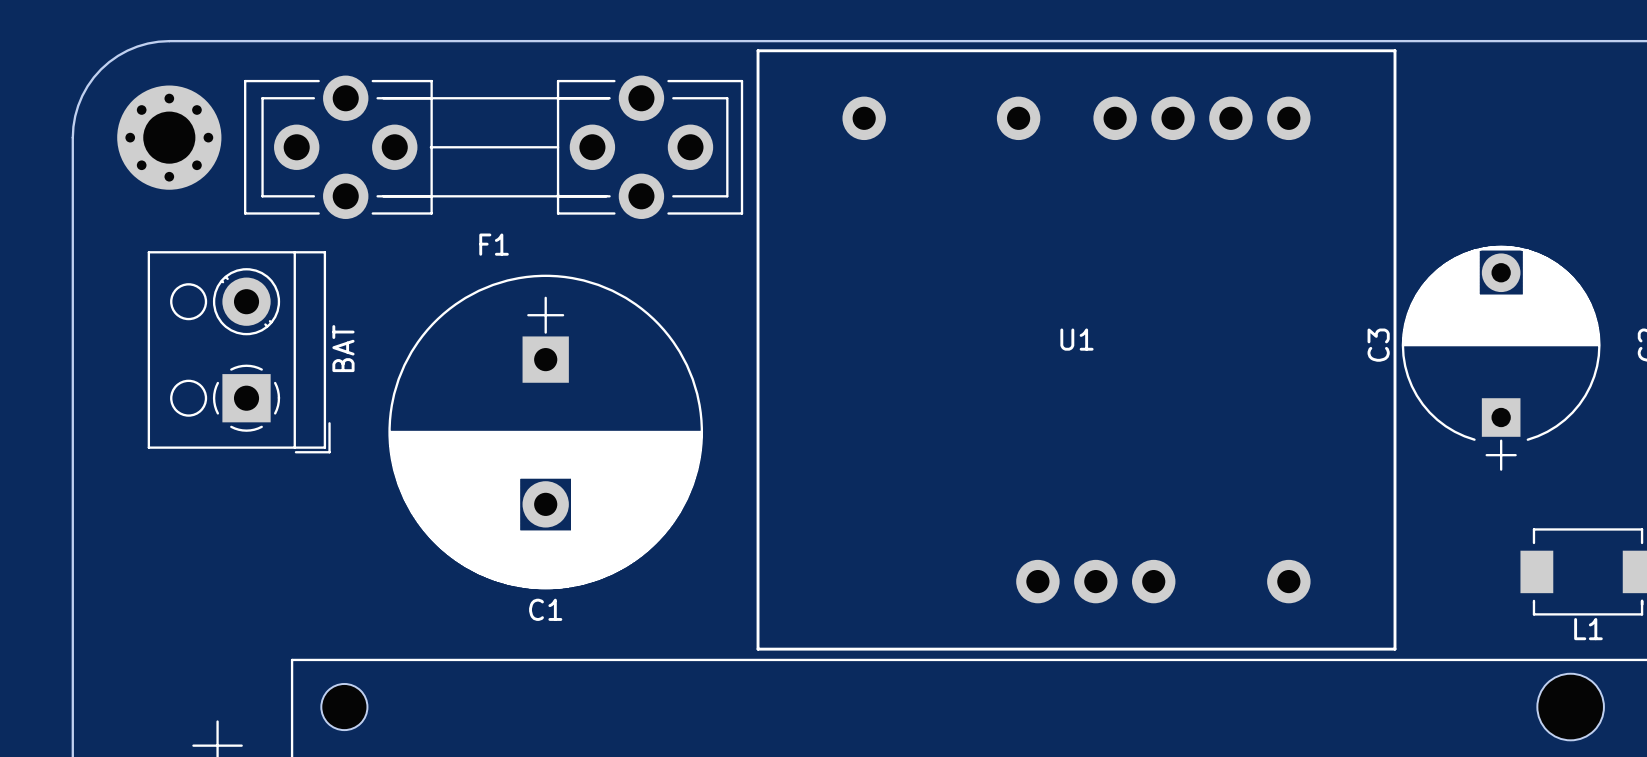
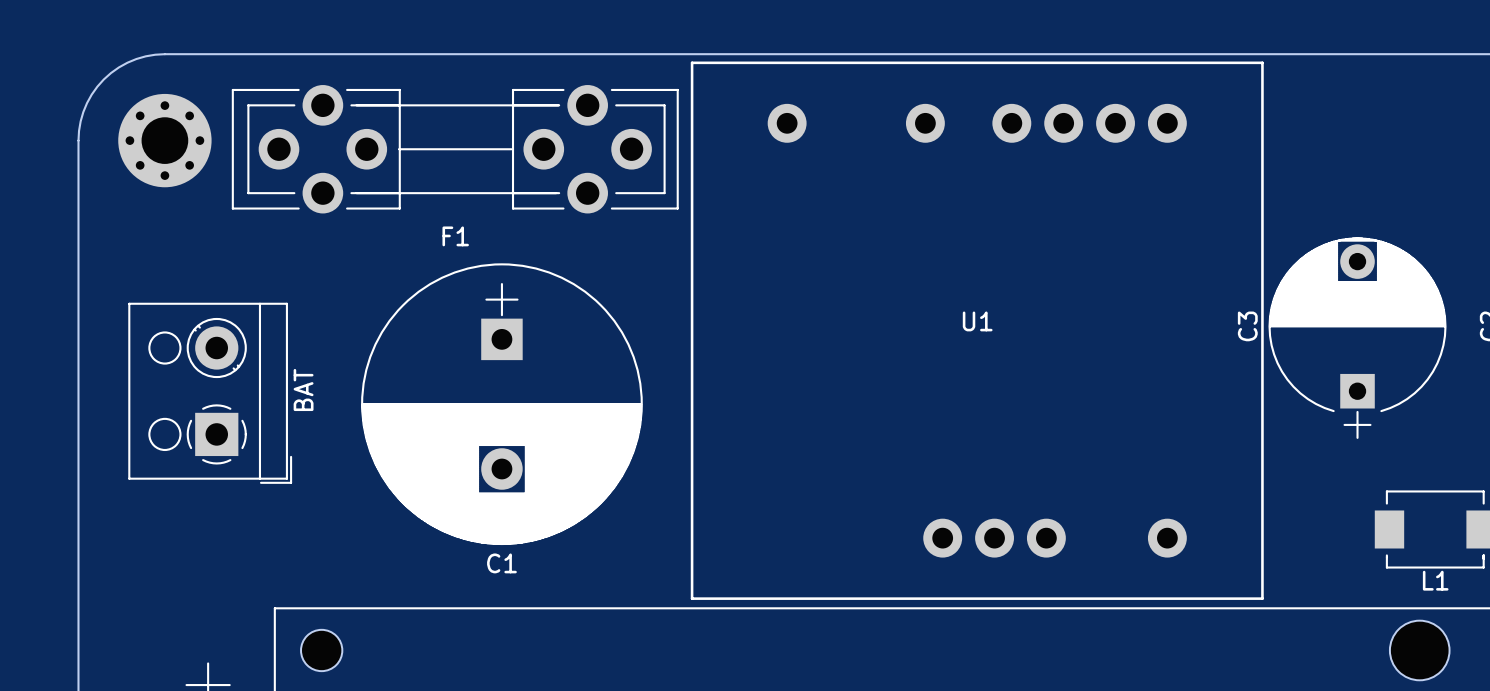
part position: (239, 352) -> (210, 393)

